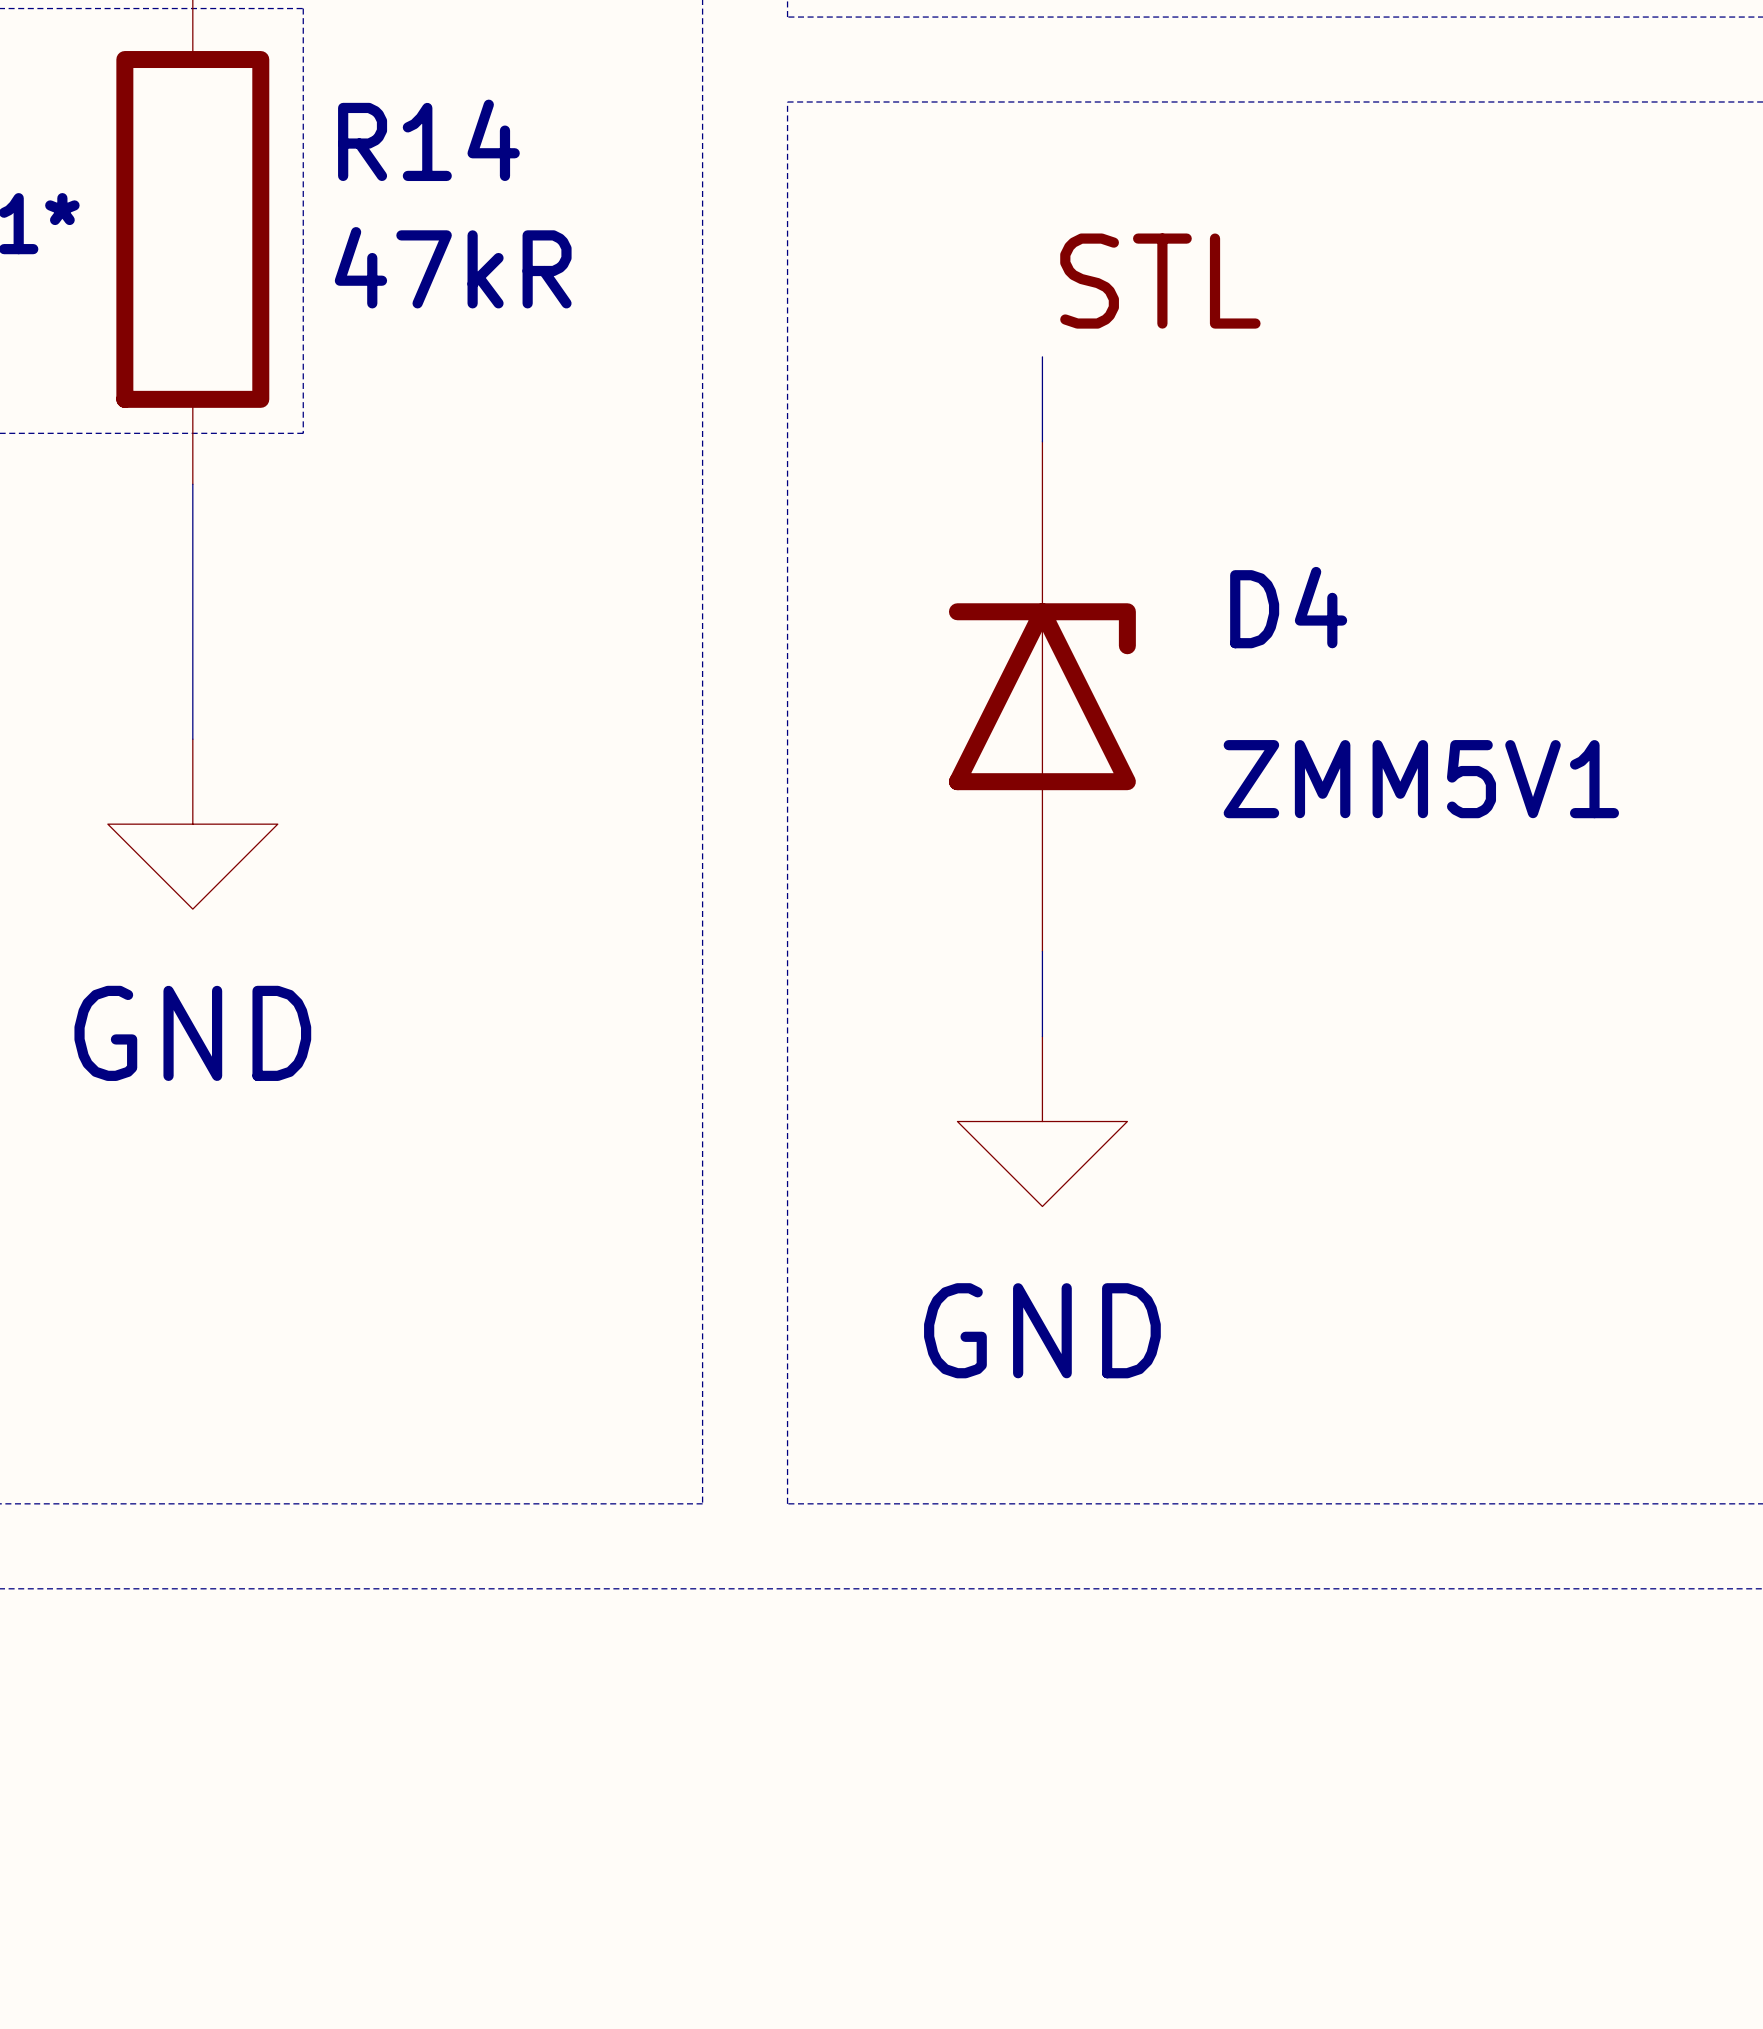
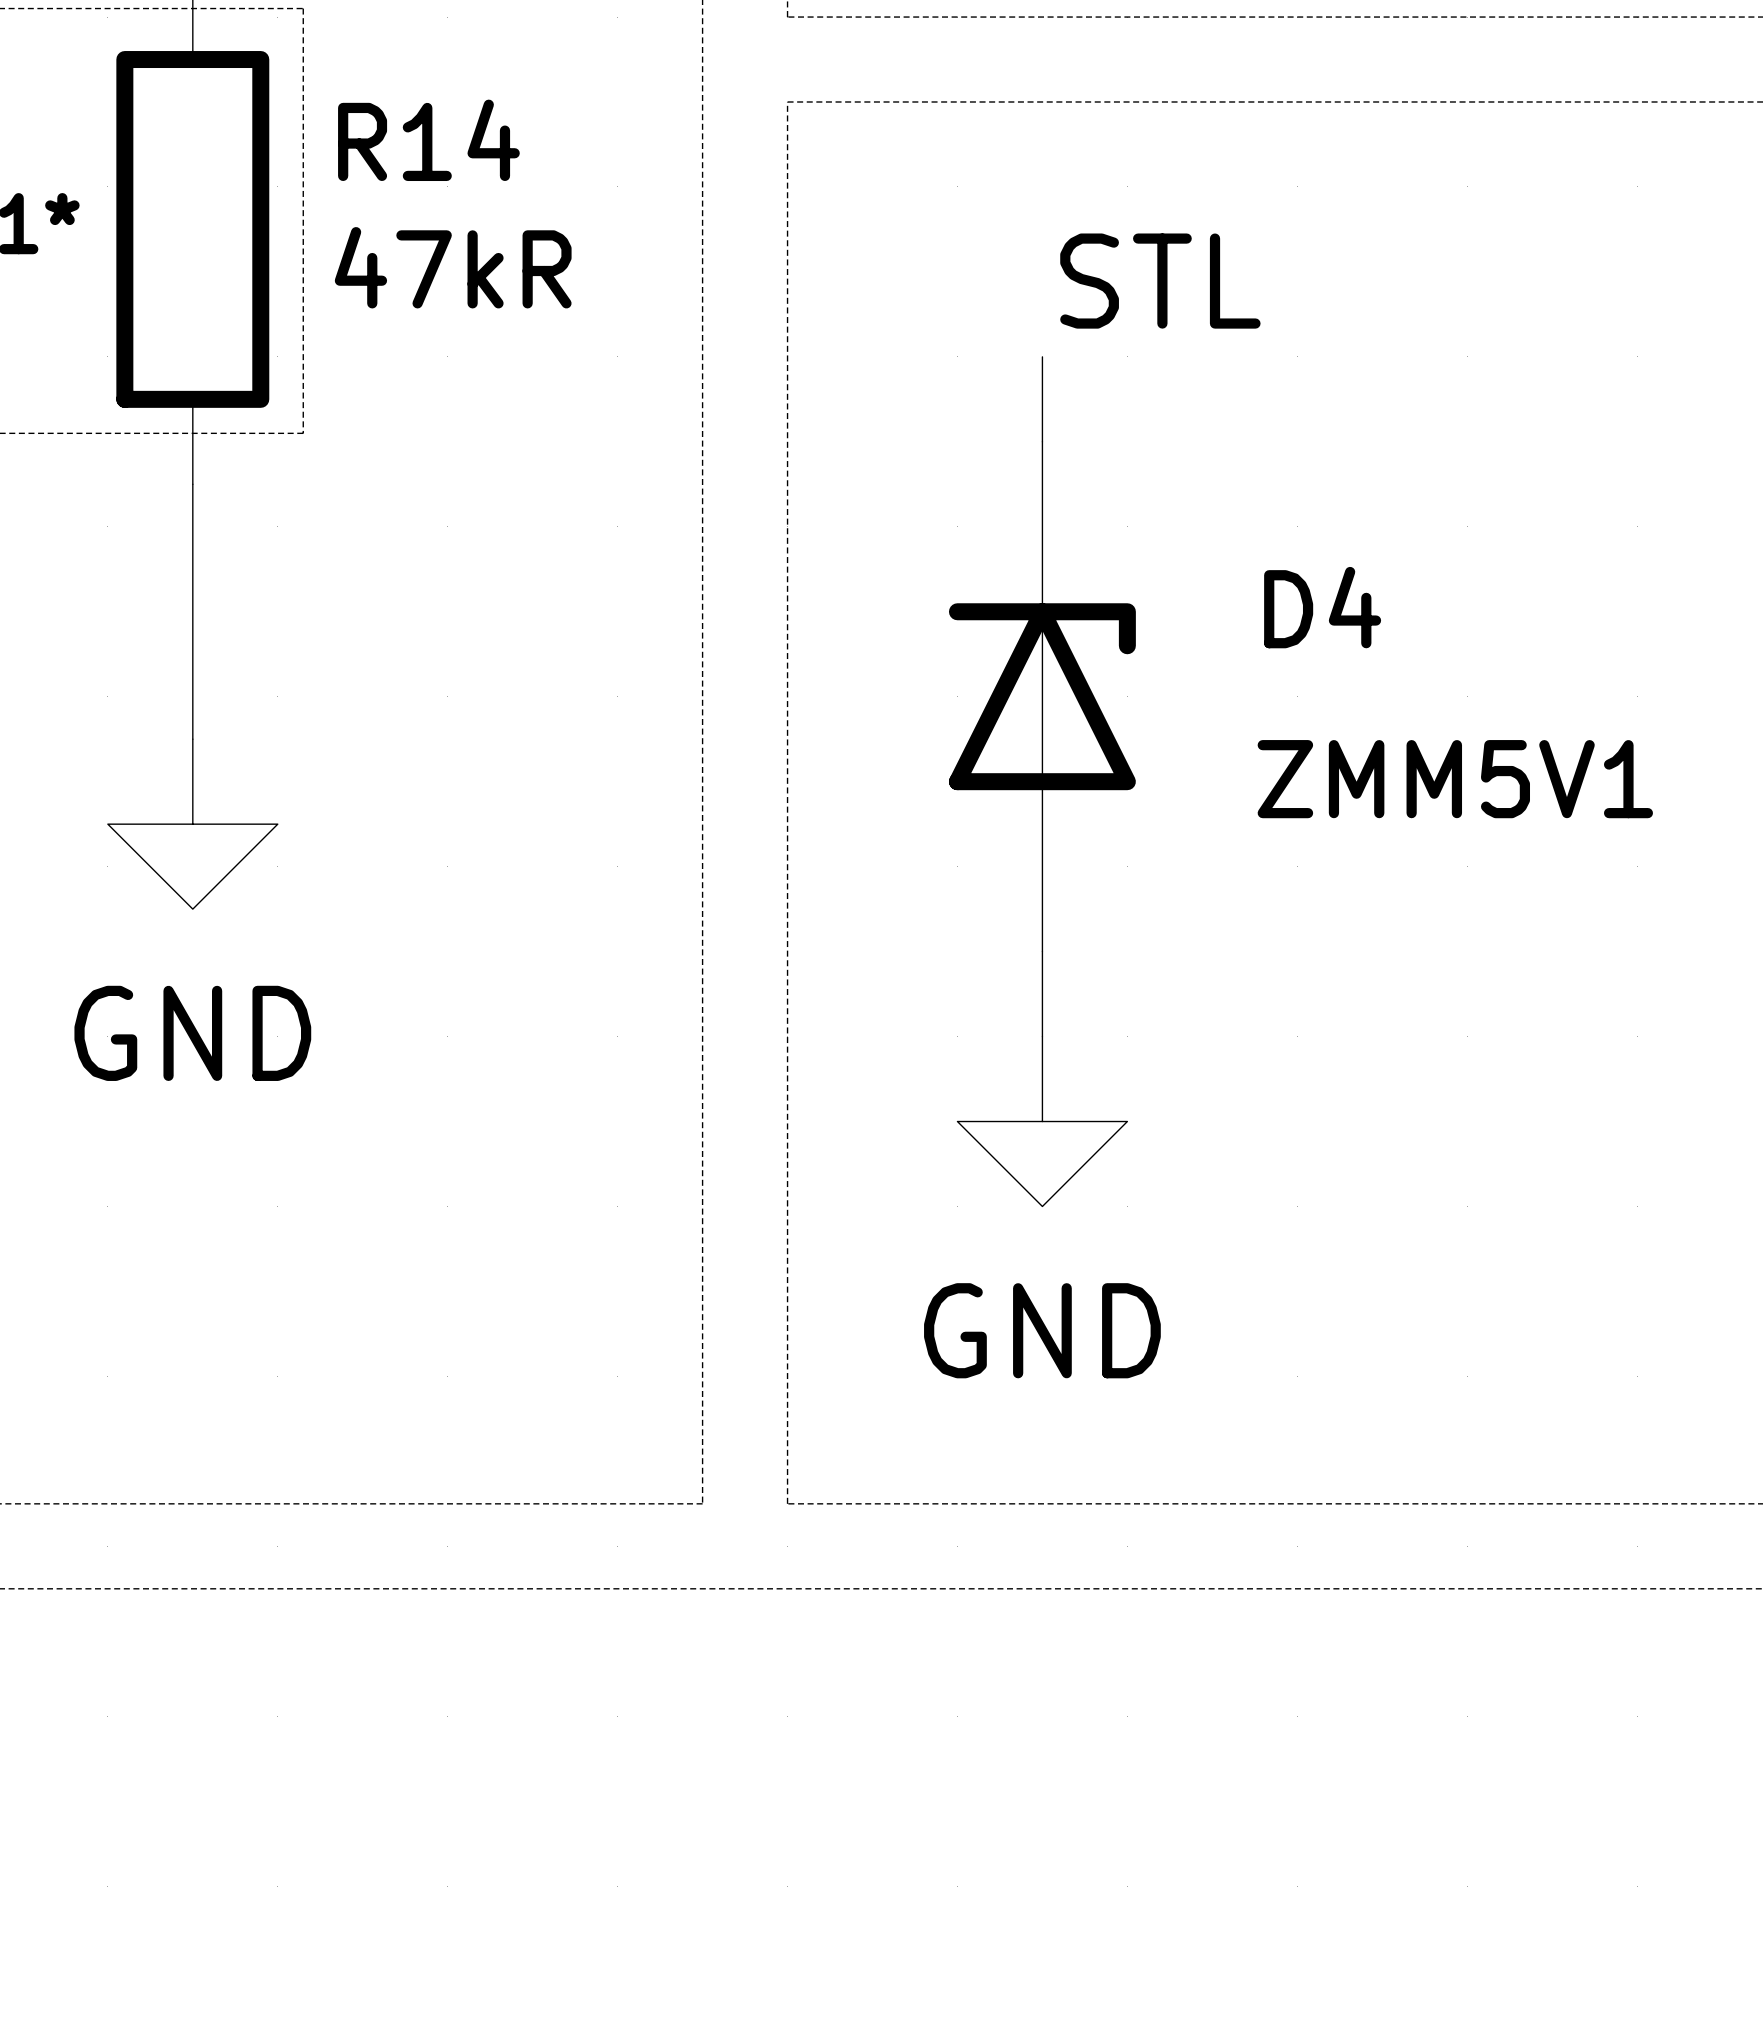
D4 name position: D4 (1288, 607) -> D4 (1322, 607)
D4 value position: ZMM5V1 (1421, 779) -> ZMM5V1 (1455, 779)

